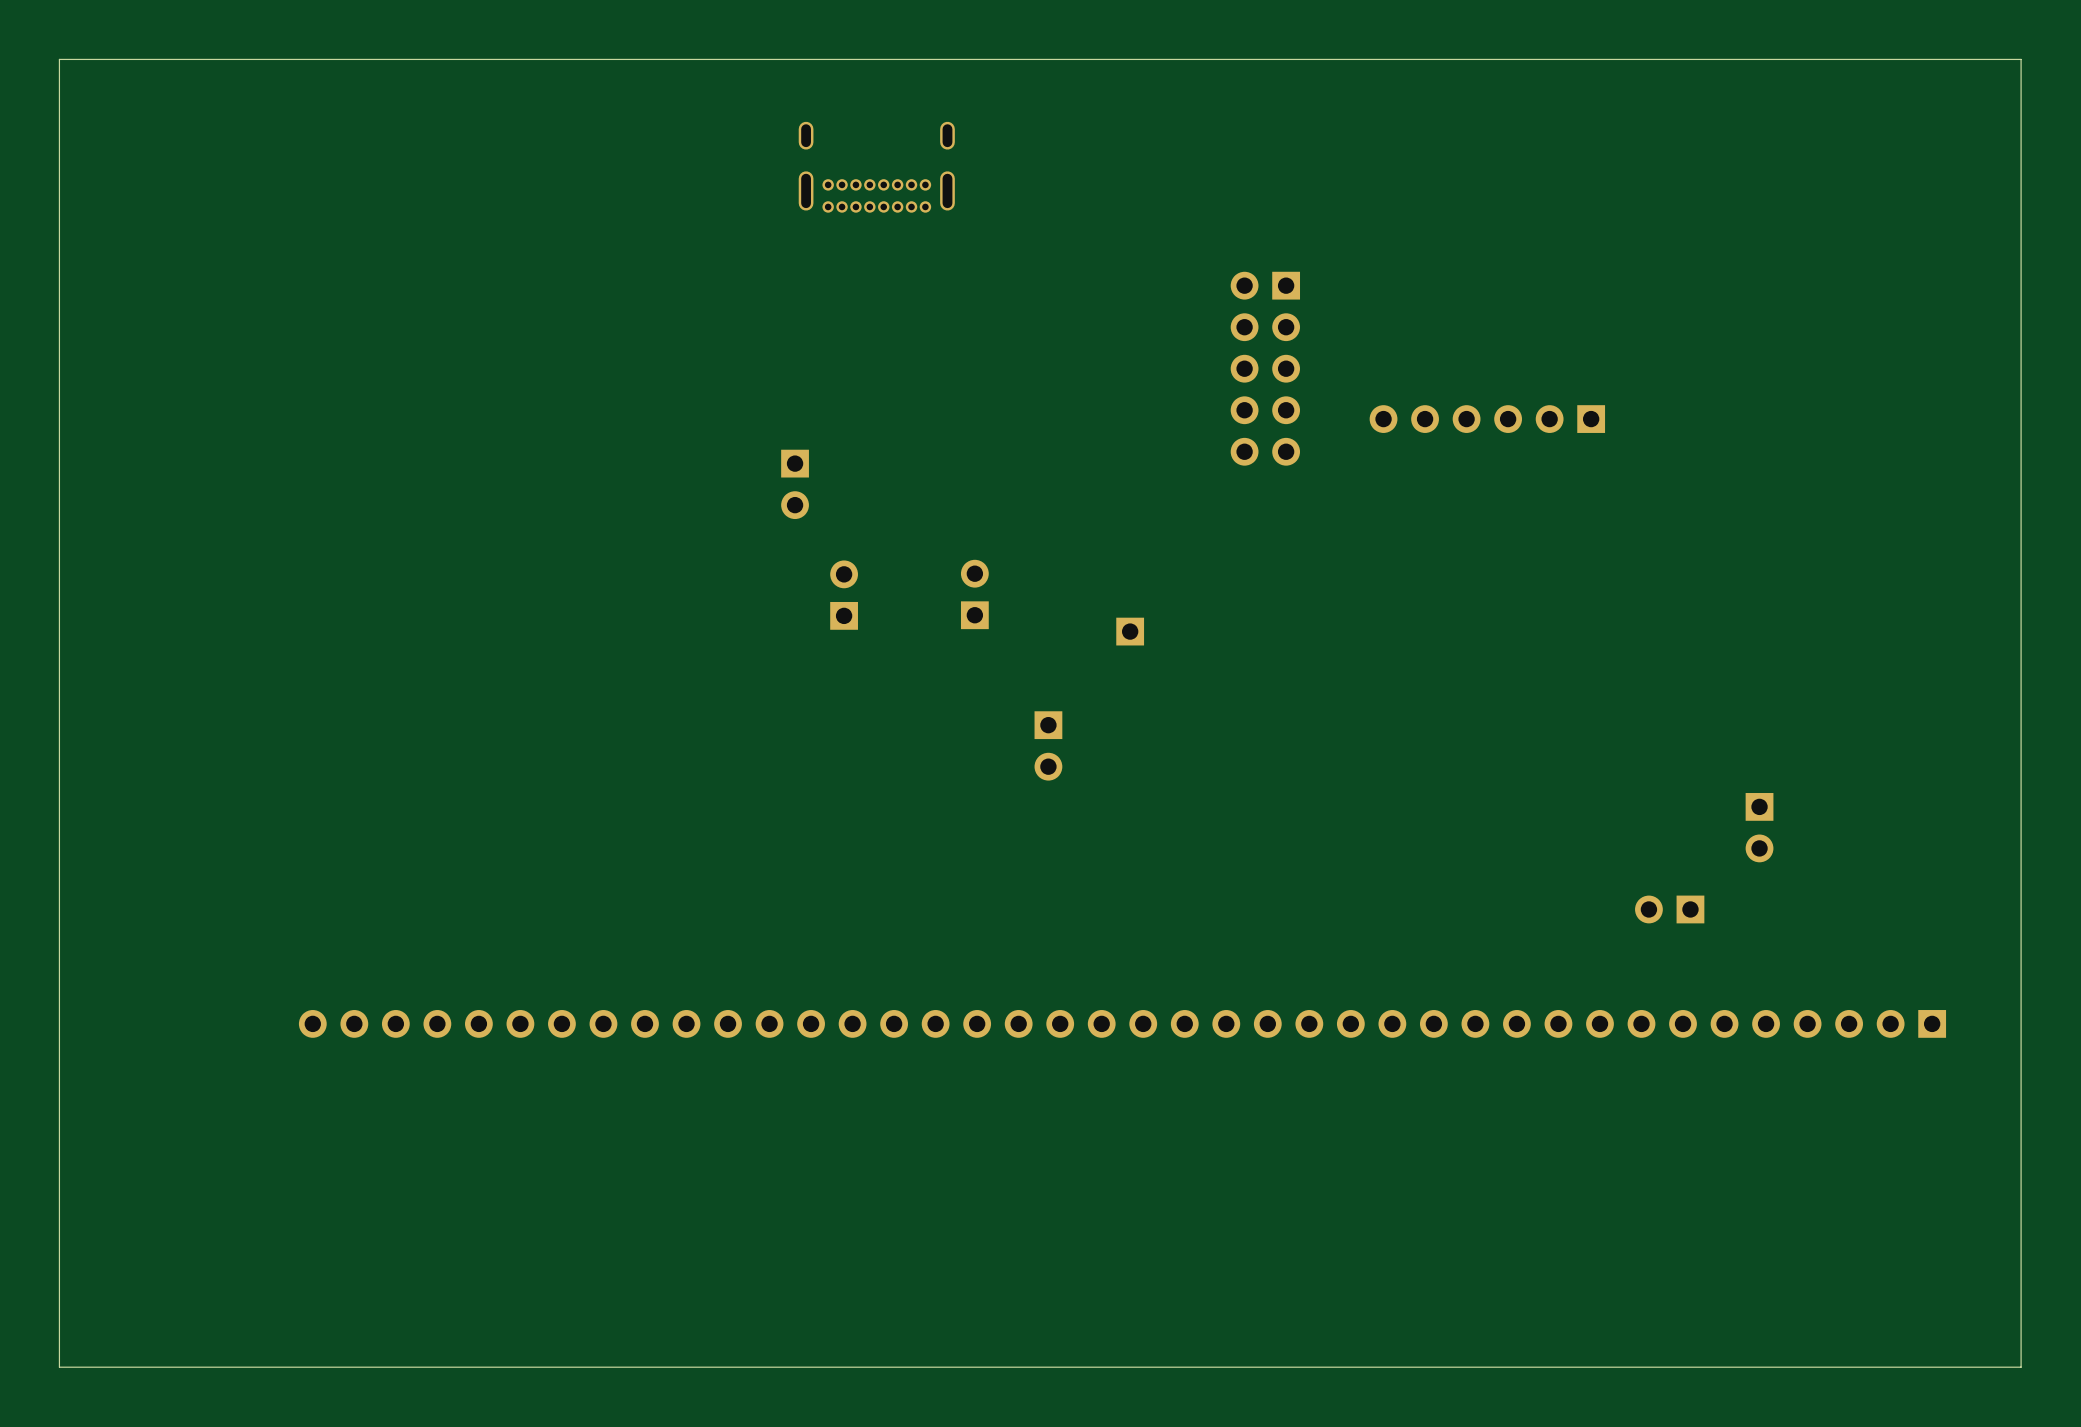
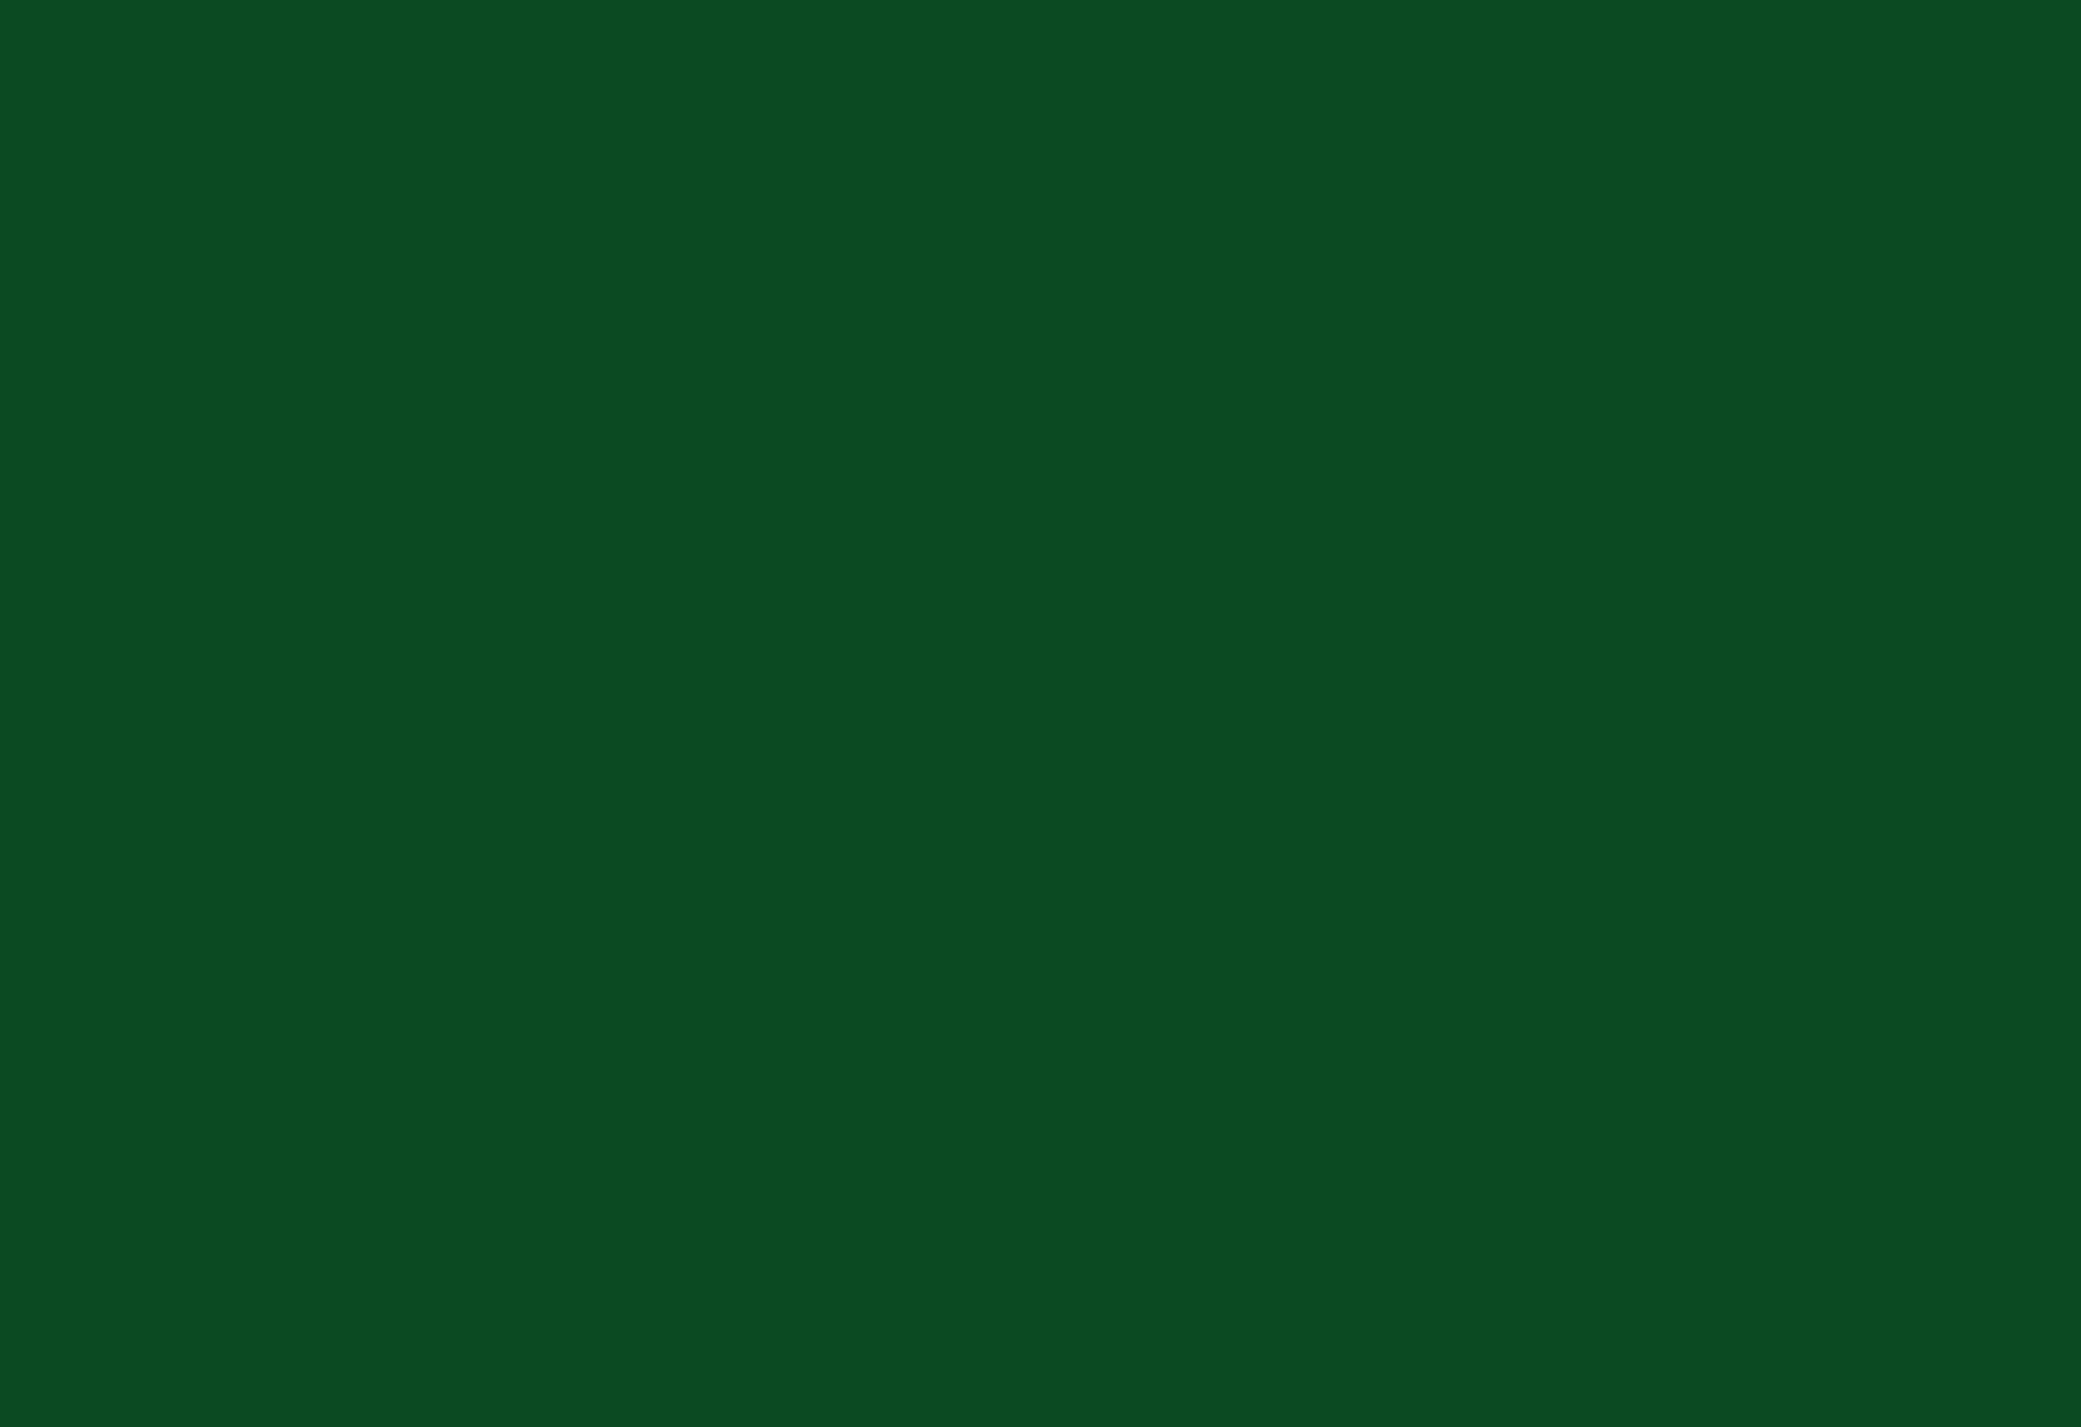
board edge: (2021, 59) (59, 59) (59, 1367) (2021, 1367) (2021, 59) -> none
part: (876, 167) -> none
part: (1265, 368) -> none
part: (1487, 419) -> none
part: (795, 484) -> none
part: (974, 594) -> none
part: (844, 595) -> none
part: (1130, 631) -> none
part: (1048, 745) -> none
part: (1759, 827) -> none
part: (1669, 909) -> none
part: (1122, 1023) -> none

